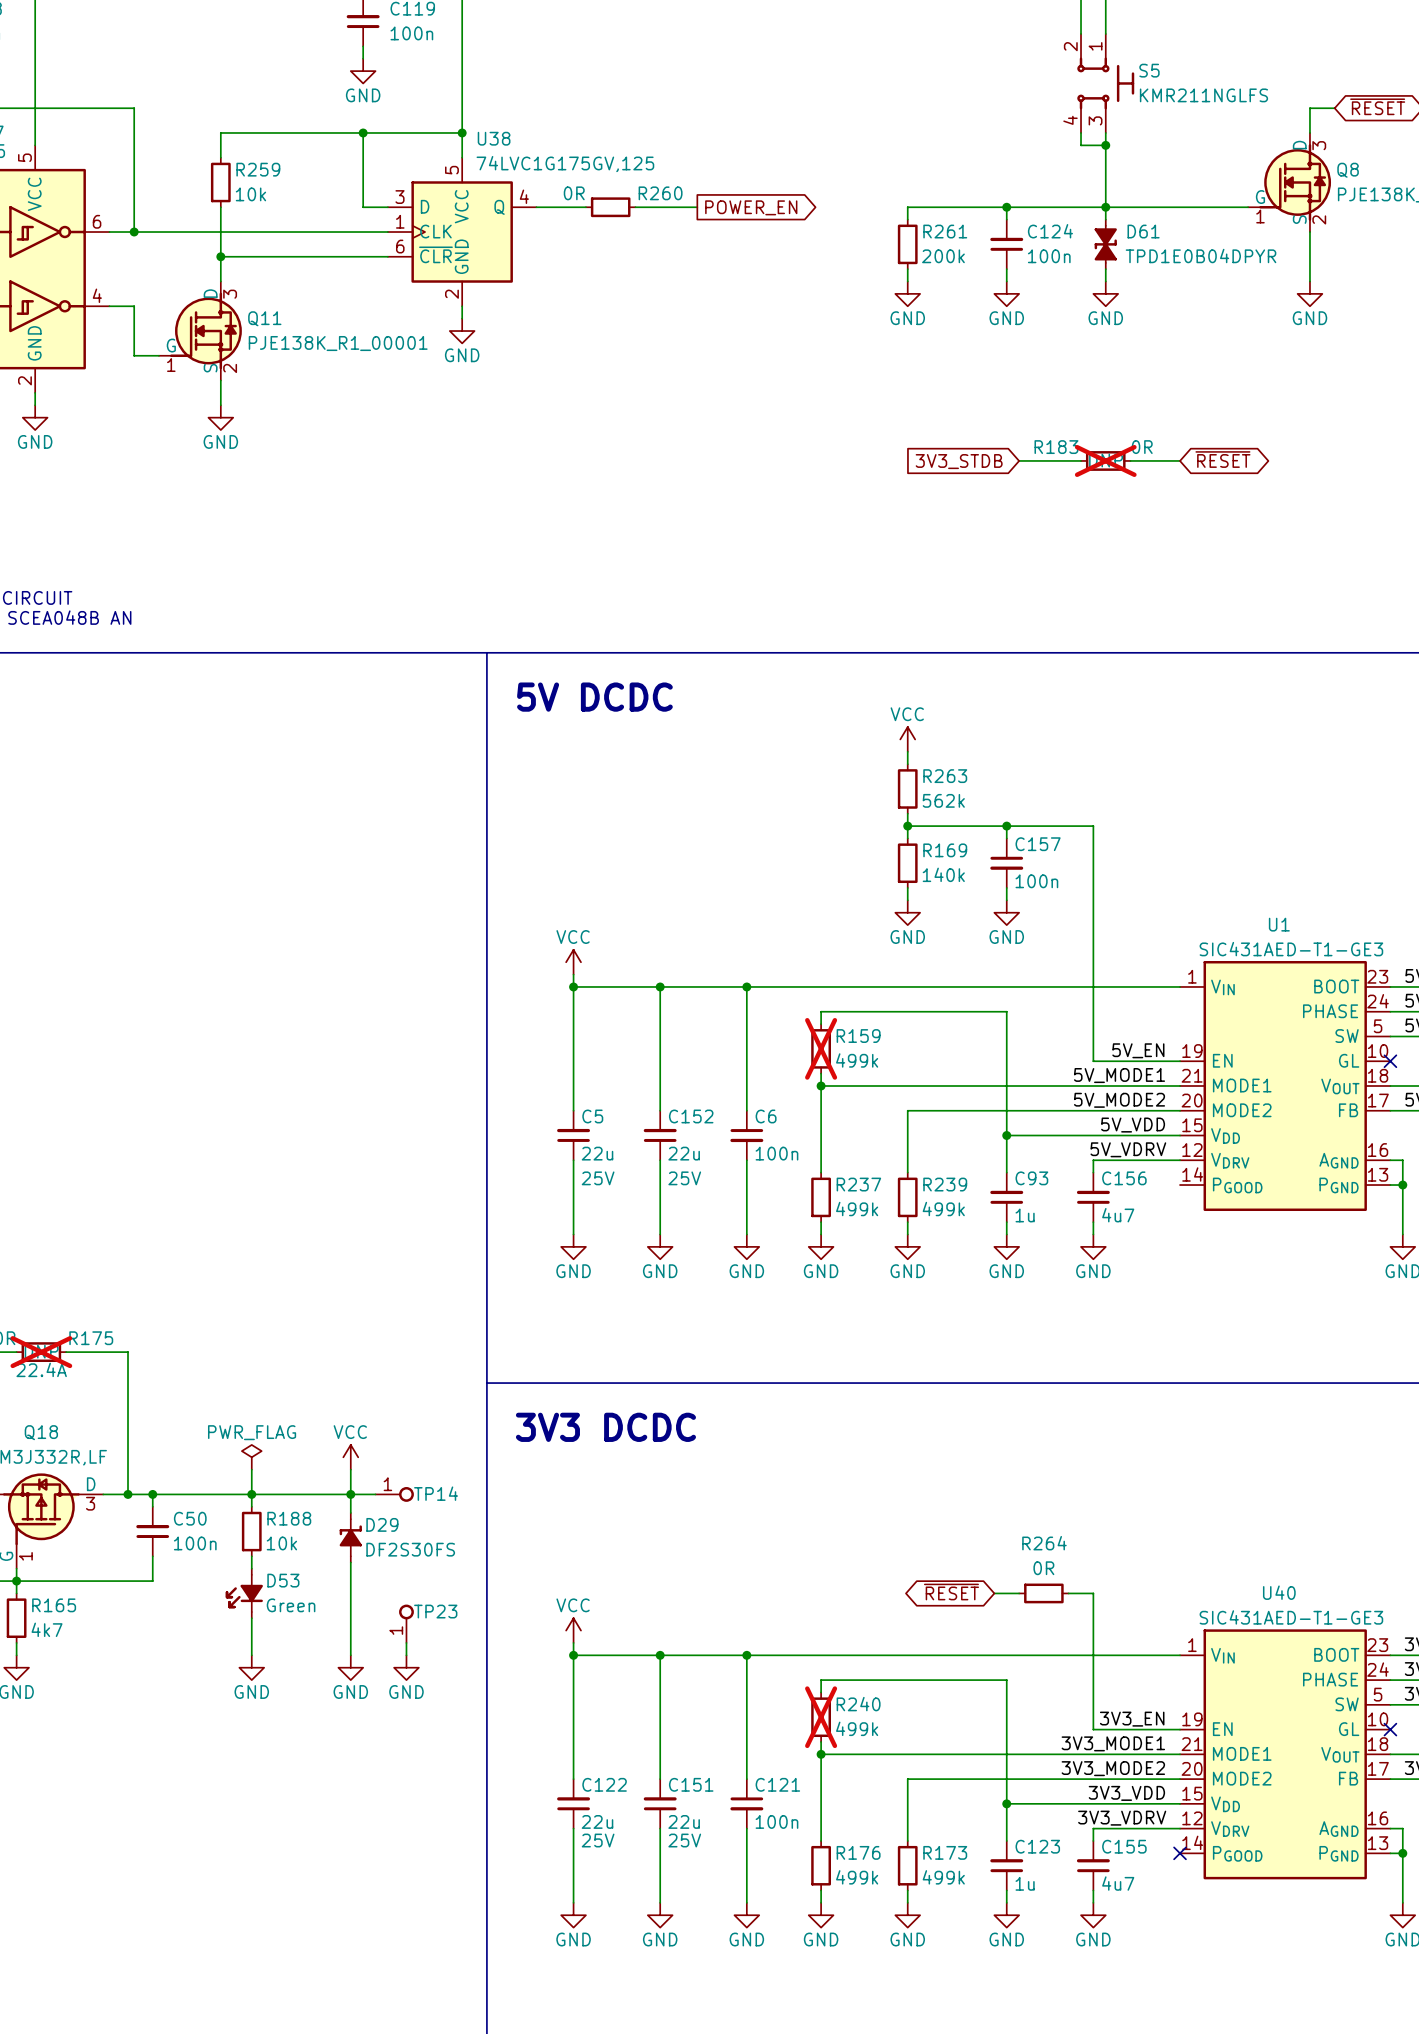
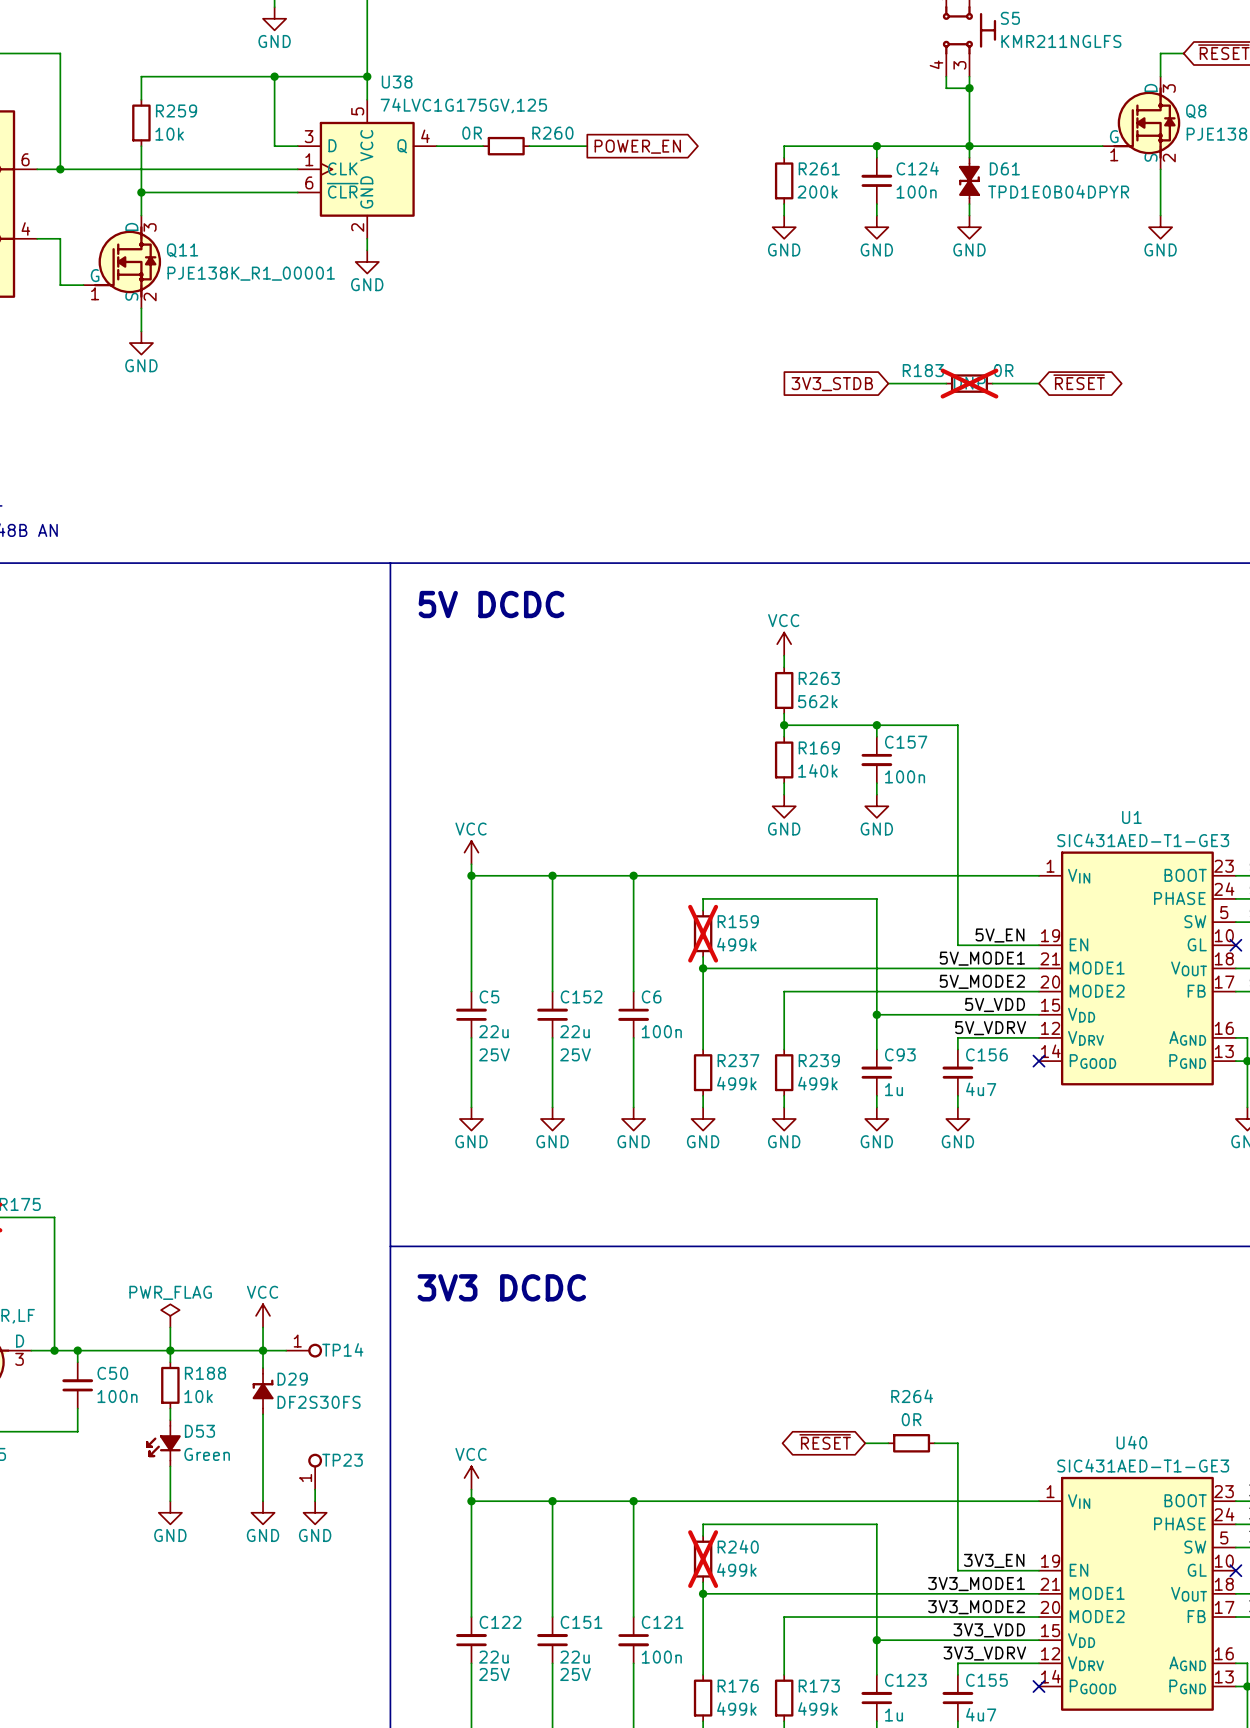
no-connect mark: none -> (1038, 1061)

